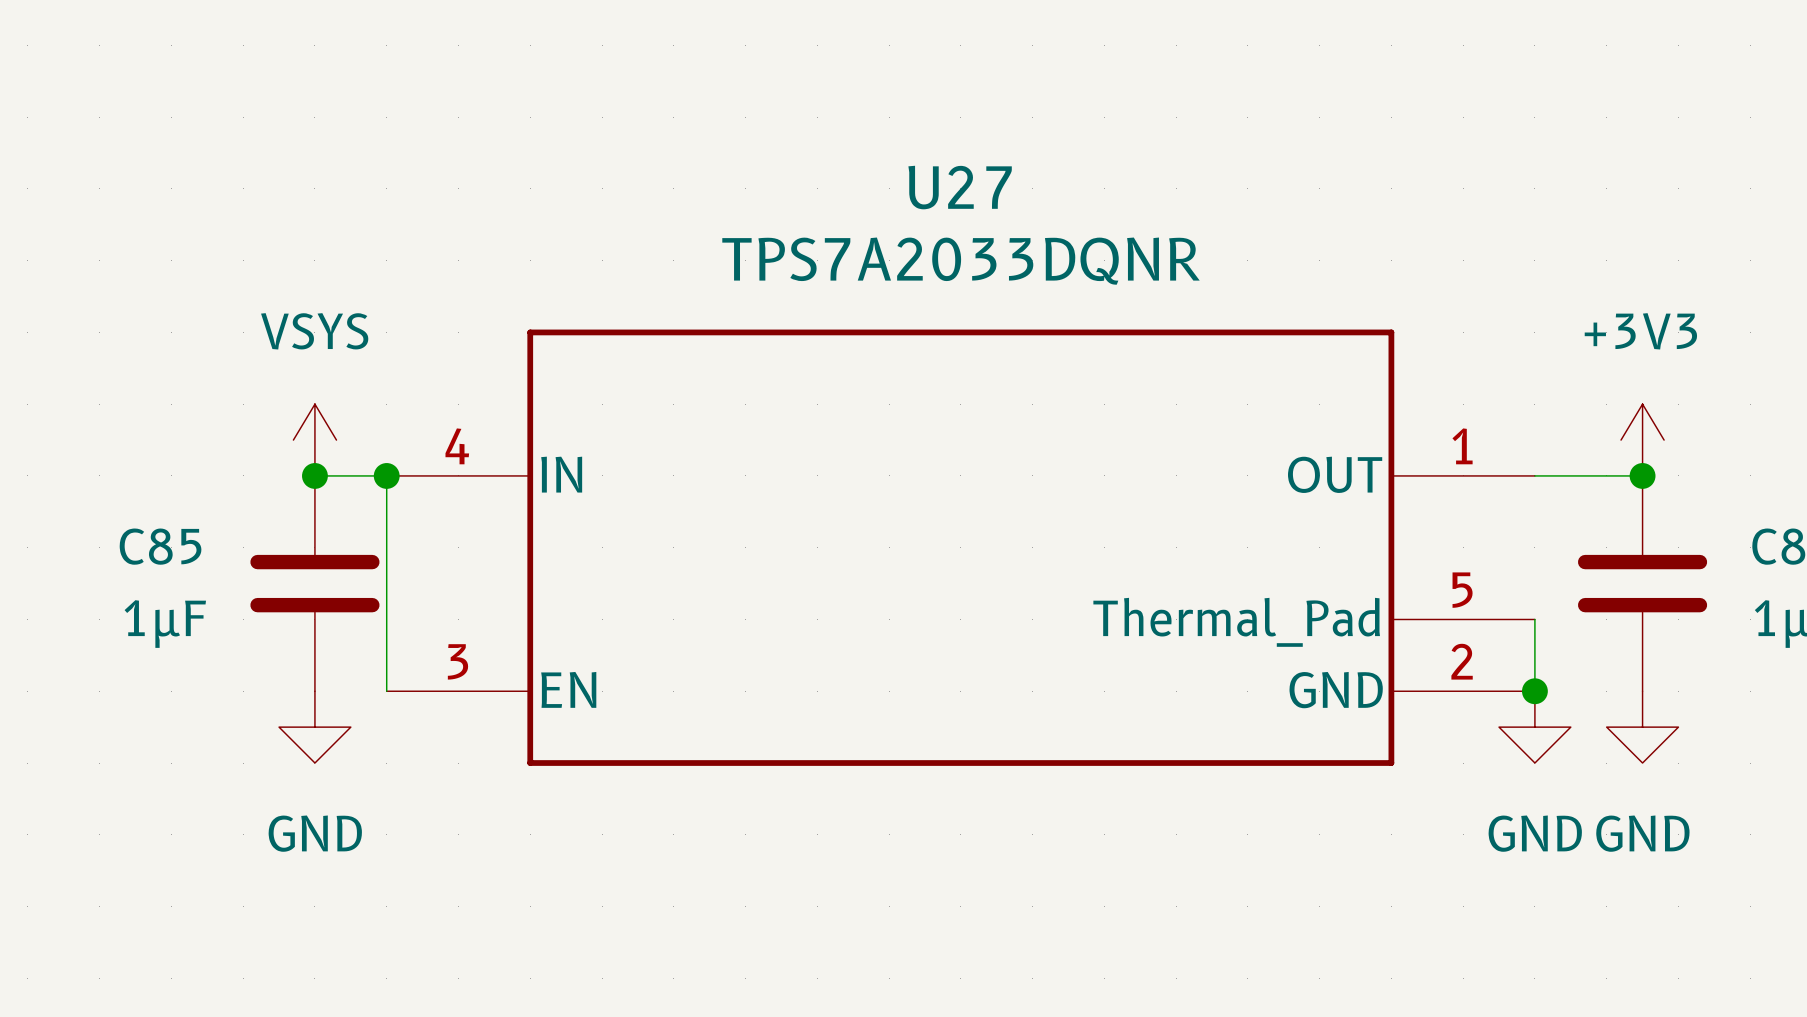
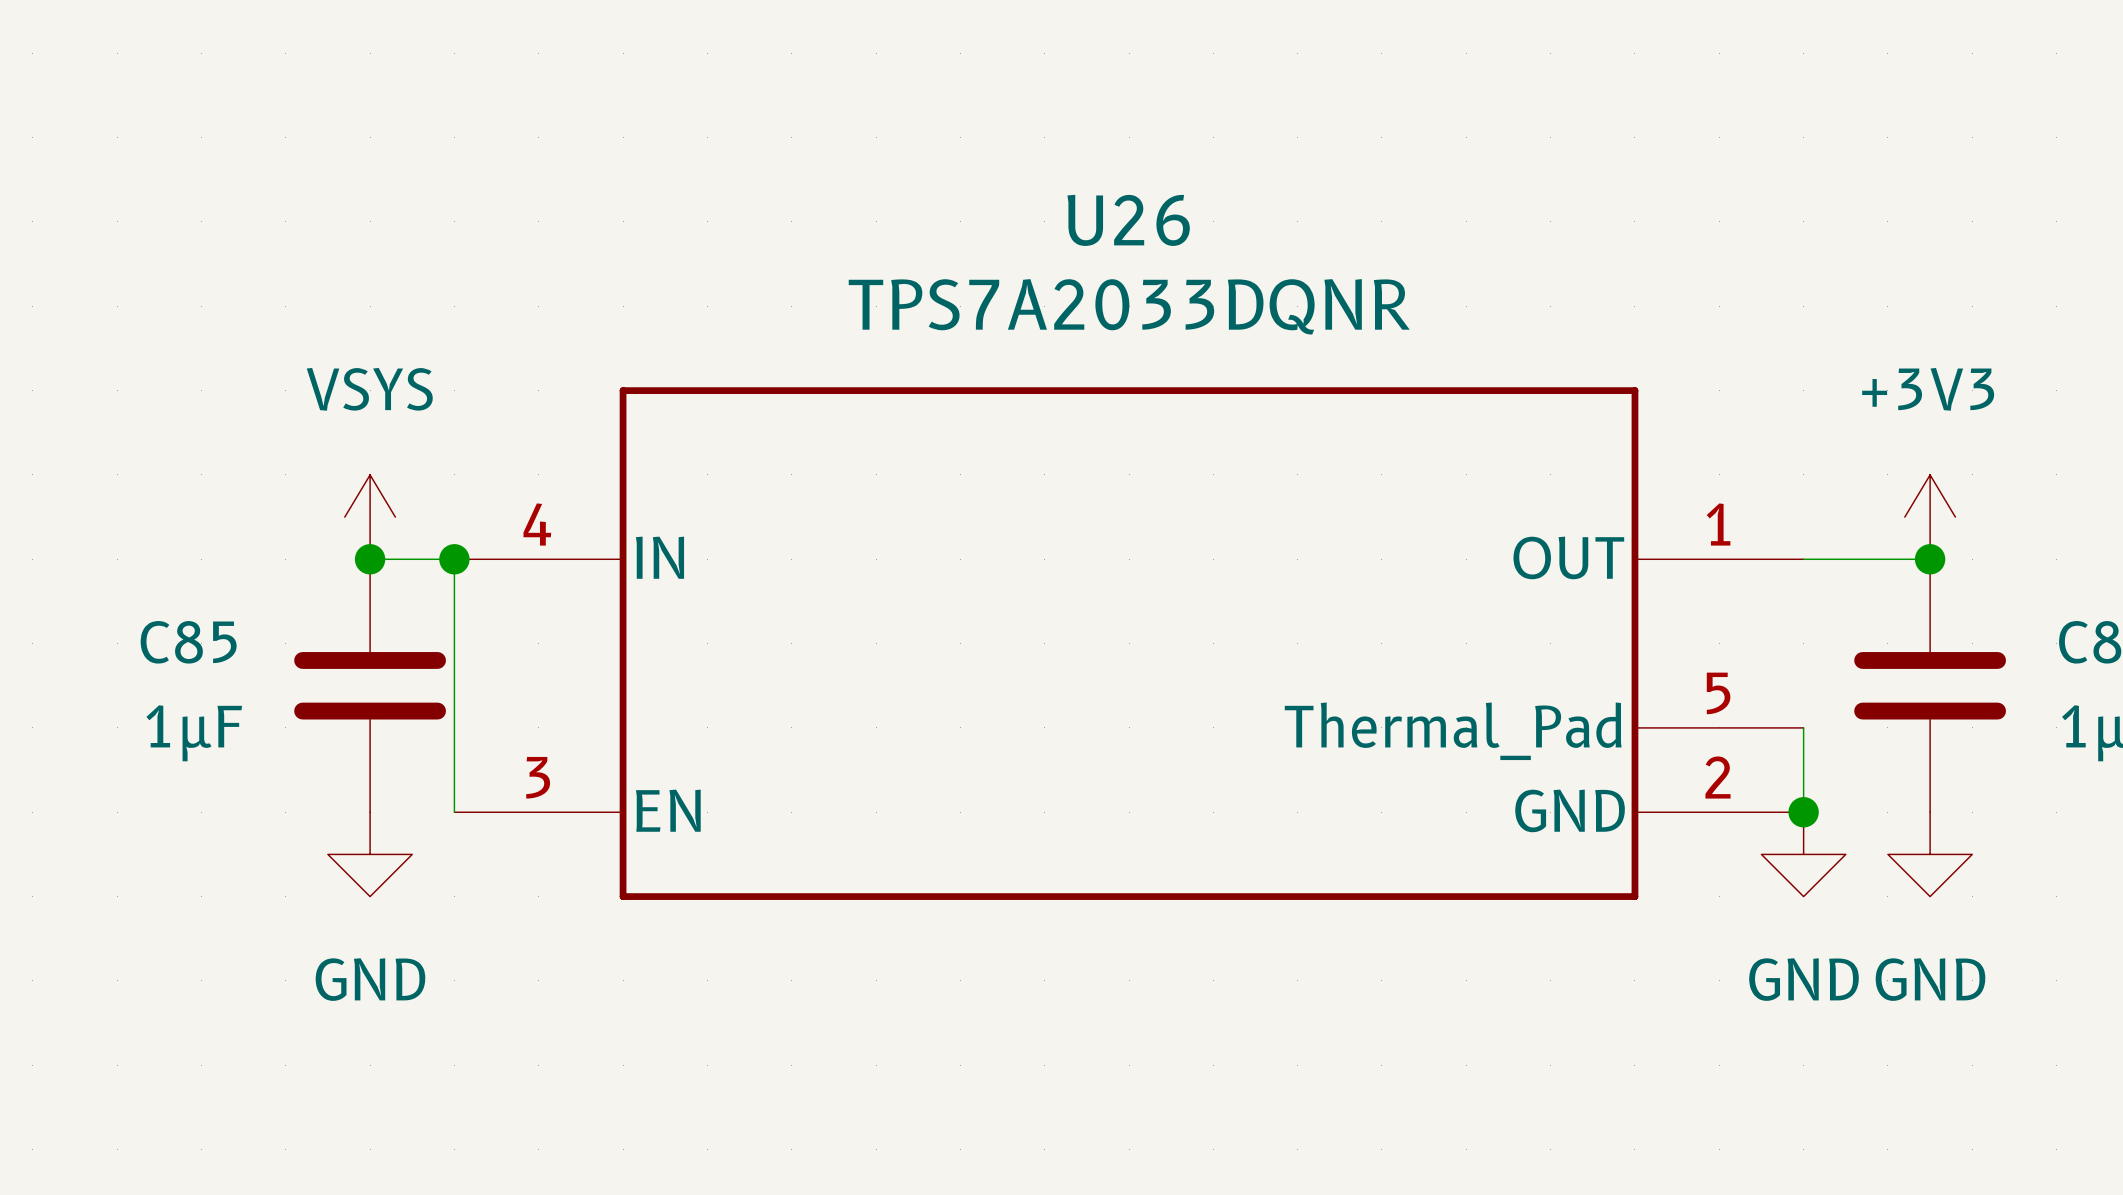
U27 name: U27 (960, 187) -> U26 (1128, 220)

